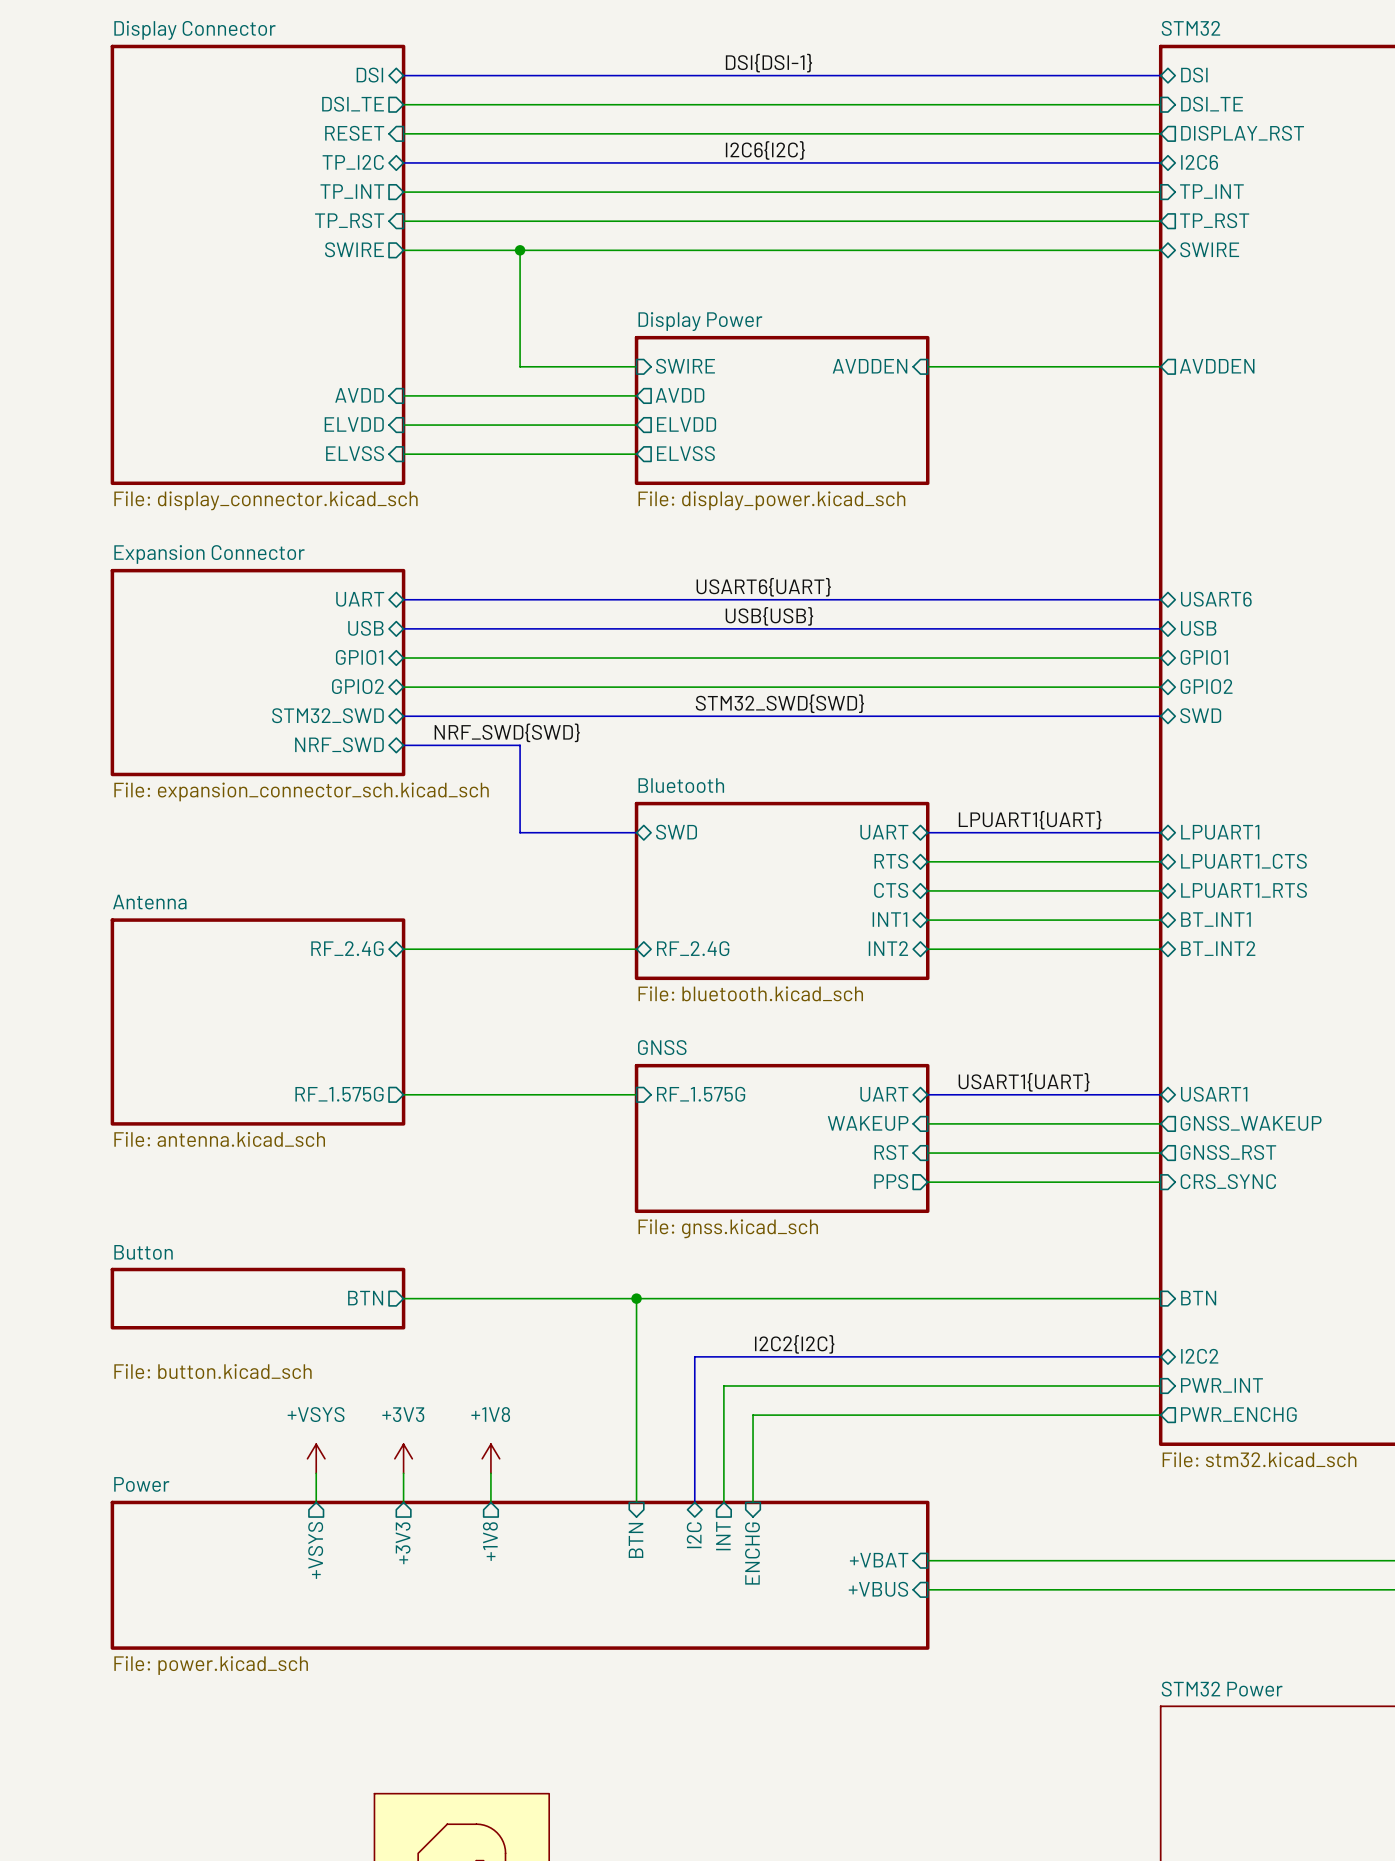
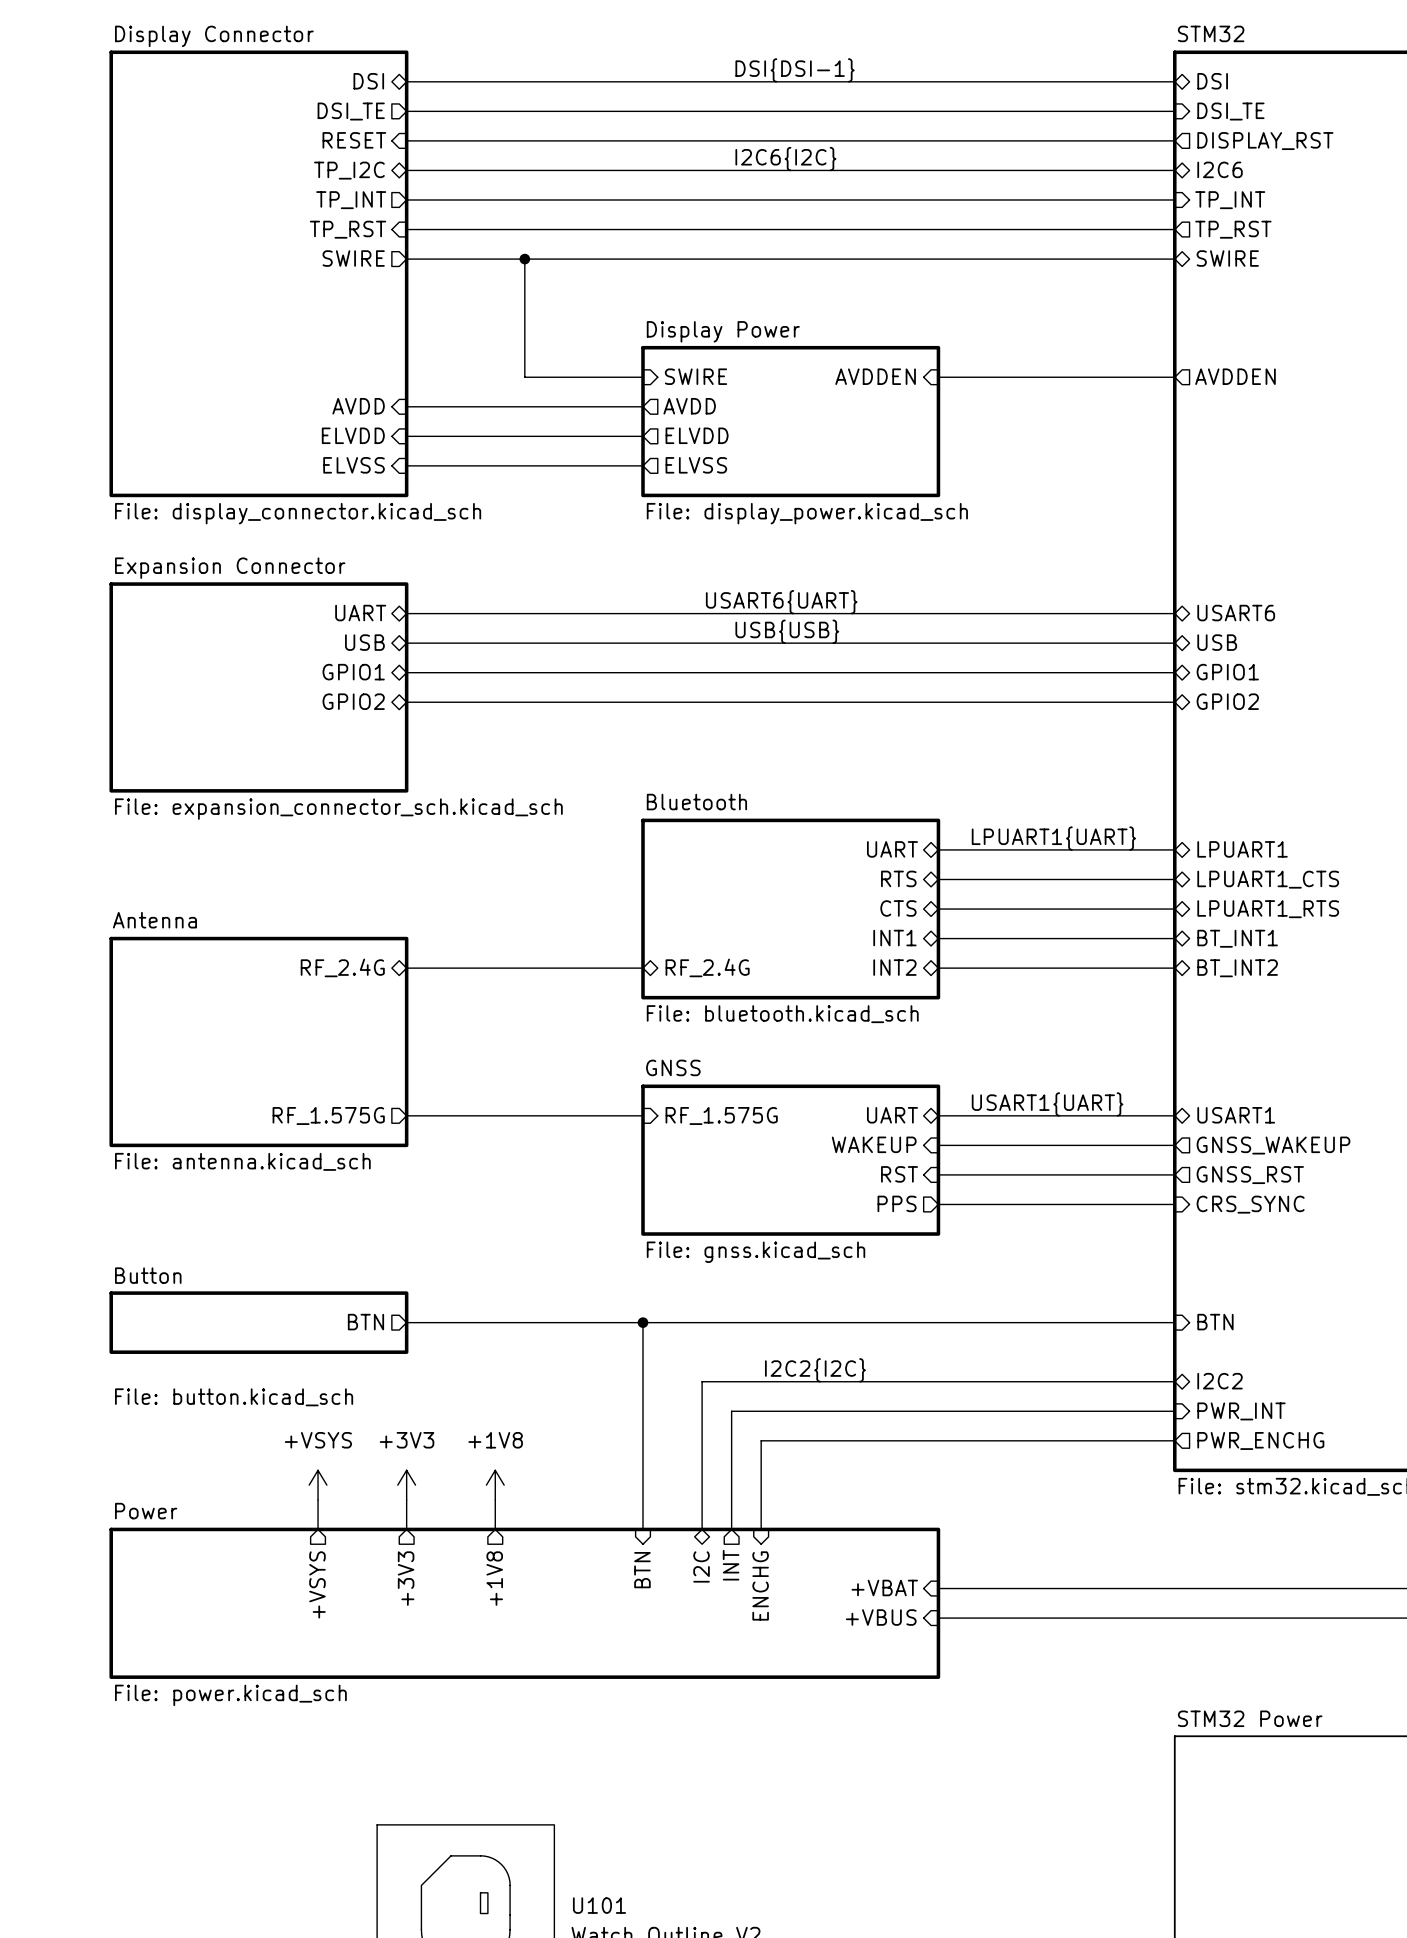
label: STM32_SWD{SWD} (779, 703) -> none
sheet pin: STM32_SWD (327, 715) -> none
sheet pin: SWD (1200, 715) -> none
bus: (403, 716) (1160, 716) -> none
label: NRF_SWD{SWD} (507, 732) -> none
sheet pin: NRF_SWD (339, 744) -> none
bus: (403, 745) (520, 745) (520, 832) (636, 832) -> none
sheet pin: SWD (676, 832) -> none

